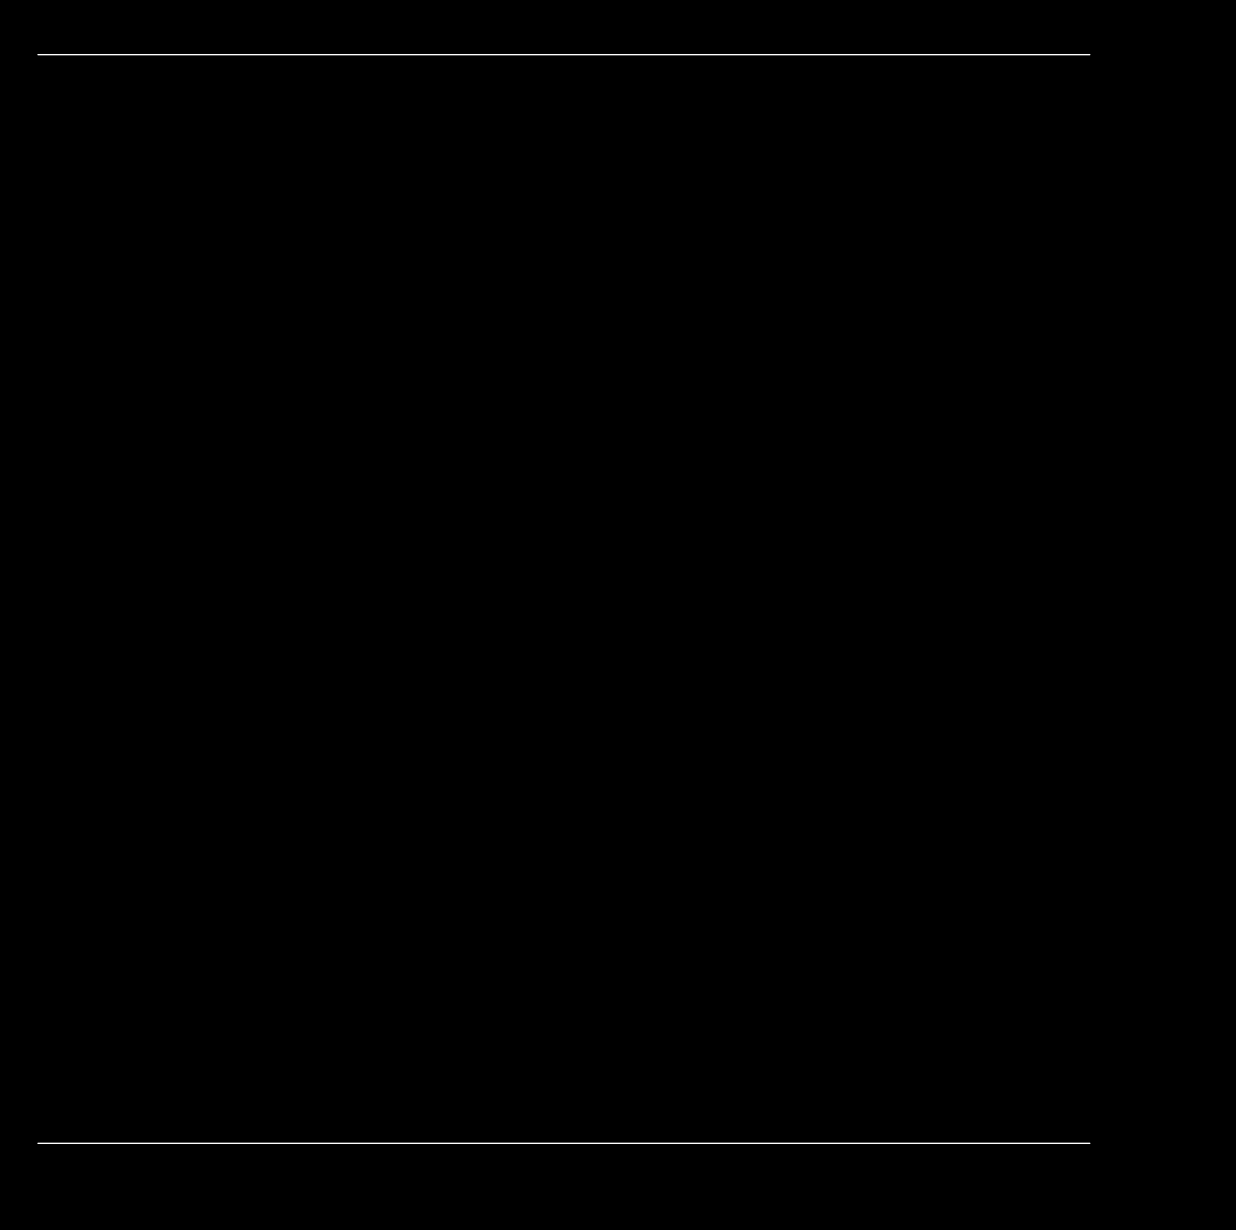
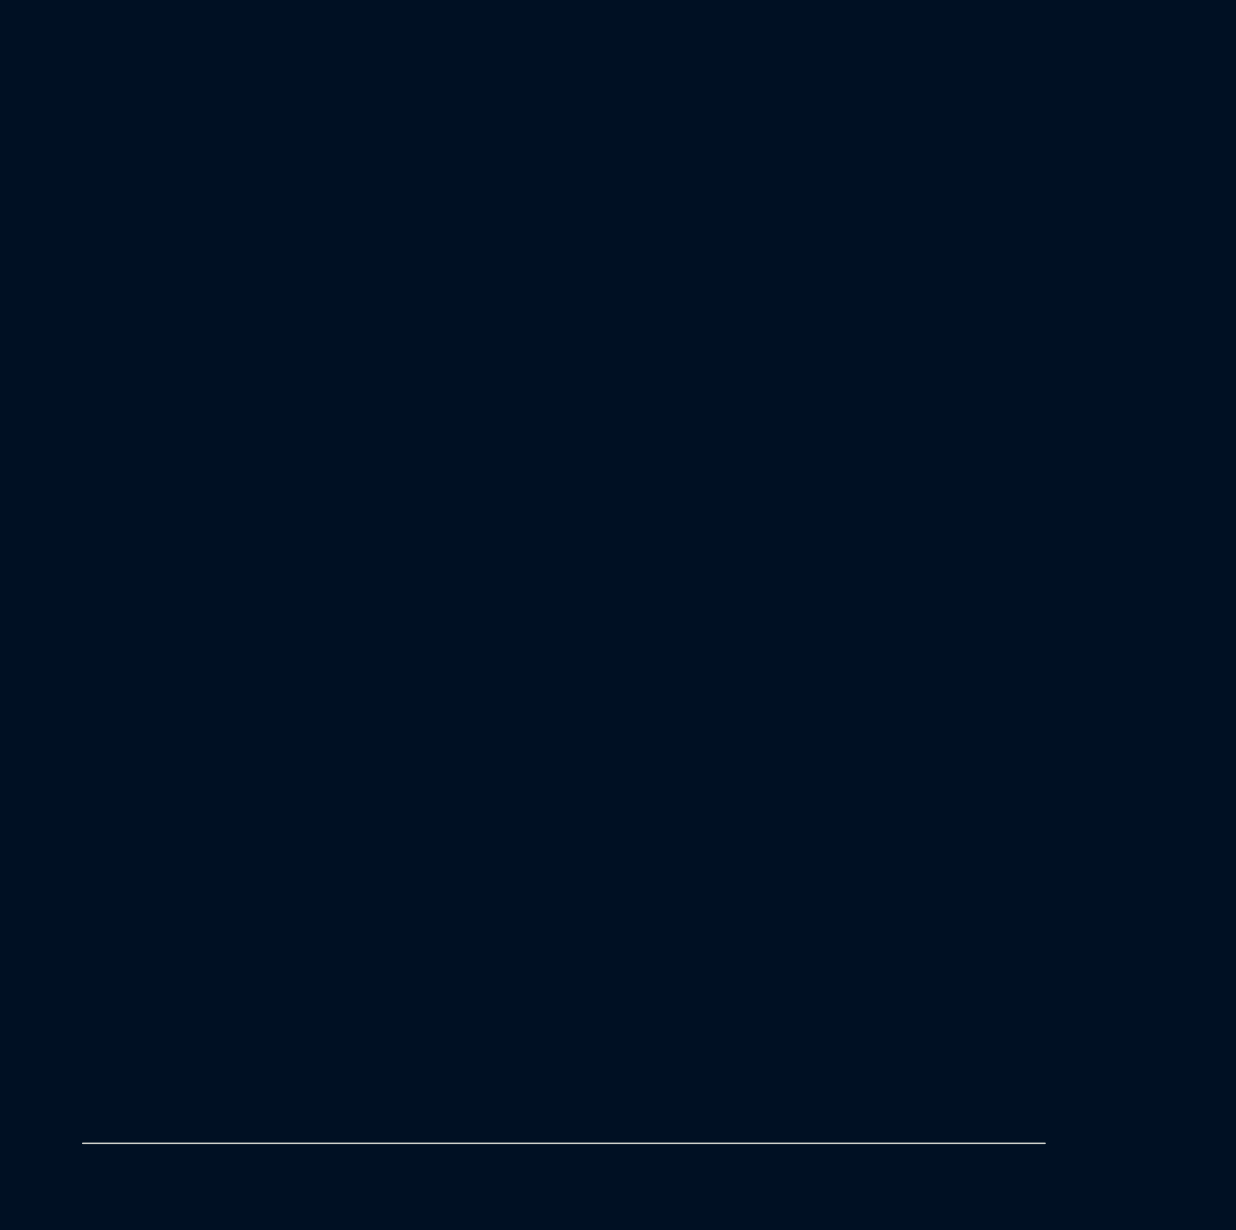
board edge: (37, 54) (1089, 54) -> none
board edge: (37, 1143) (82, 1143) -> none
board edge: (1045, 1143) (1089, 1143) -> none

